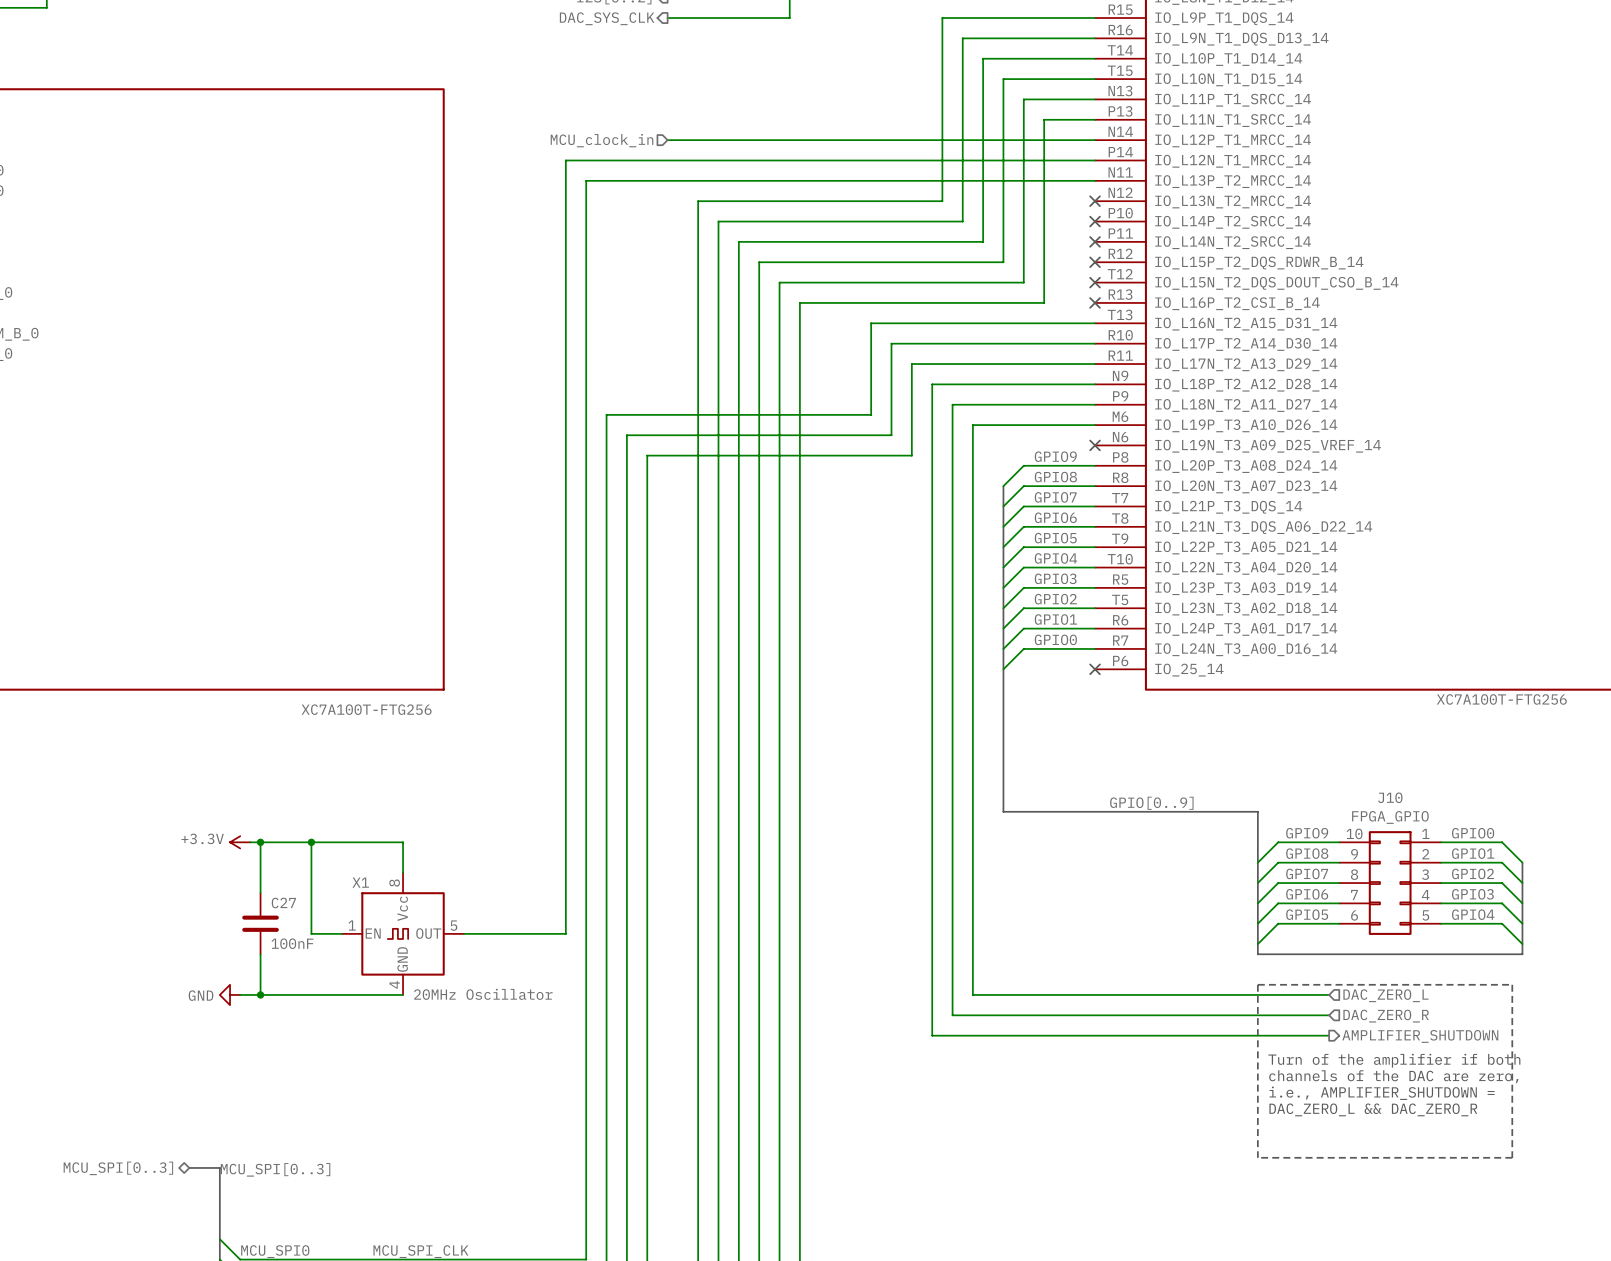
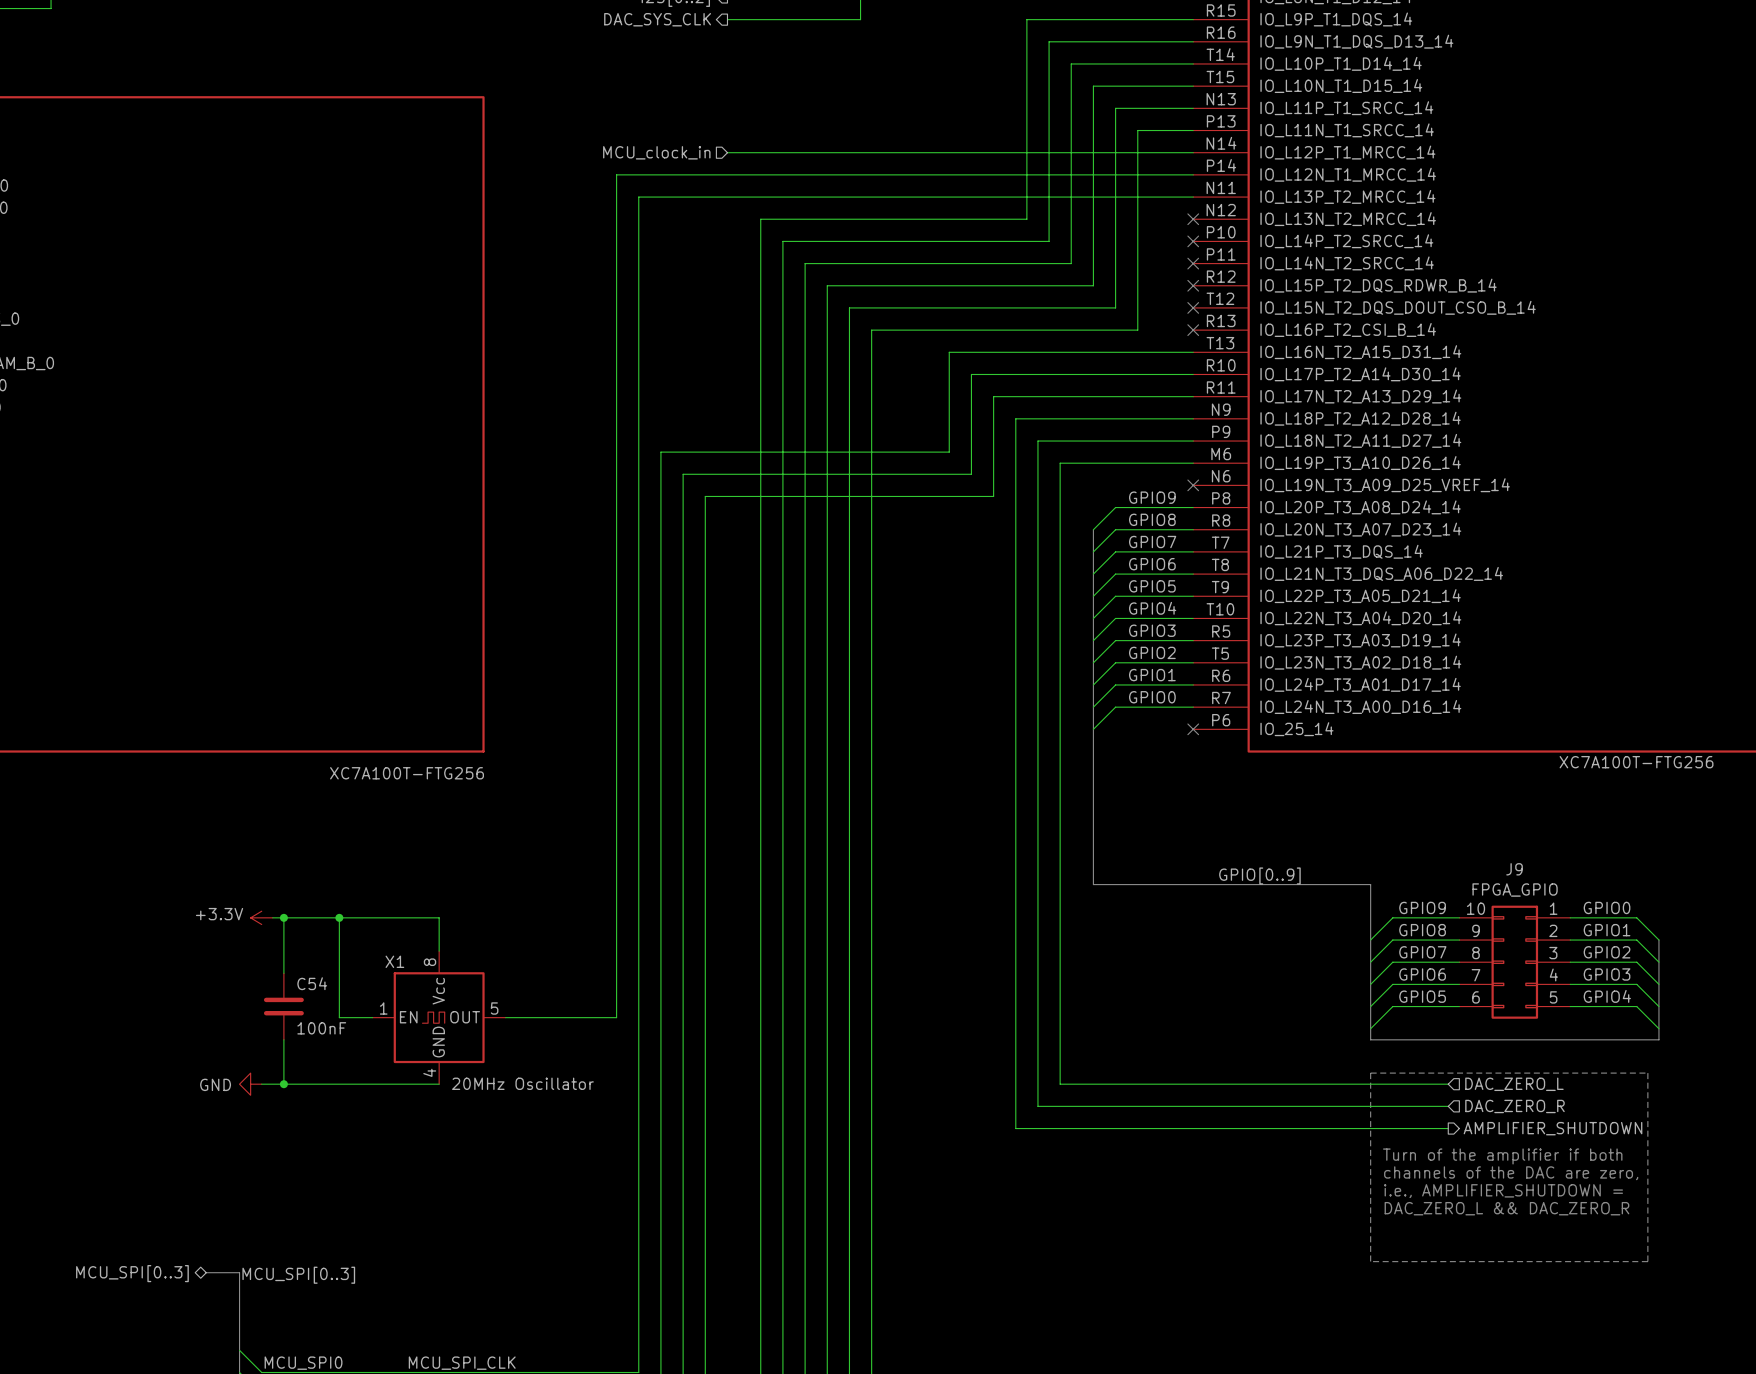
J10 name: J10 (1390, 797) -> J9 (1514, 869)
C27 name: C27 (283, 903) -> C54 (312, 983)

